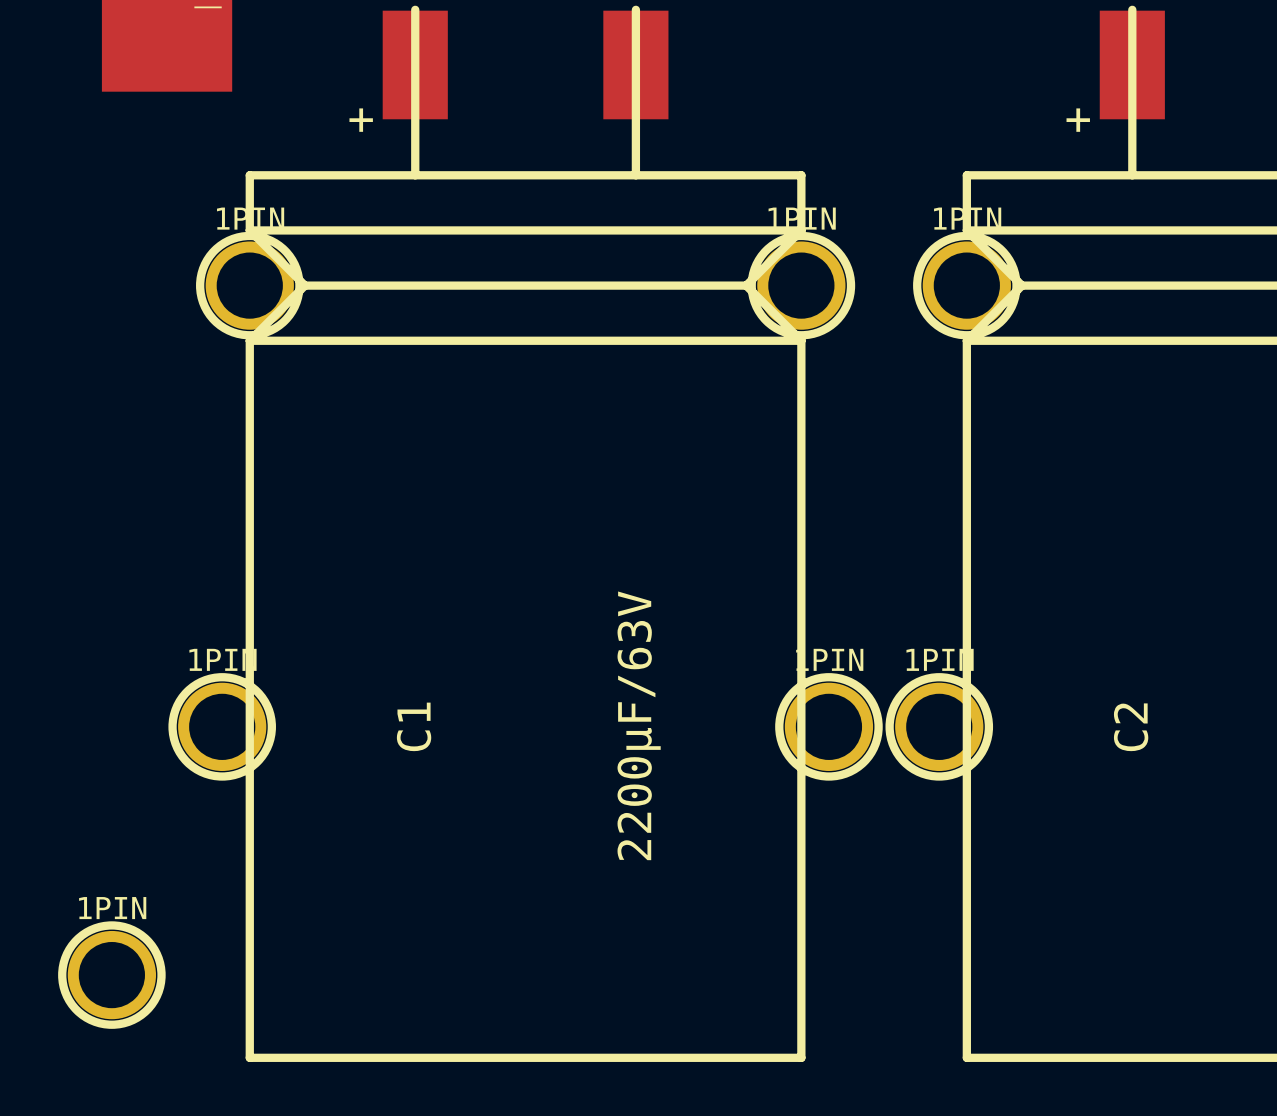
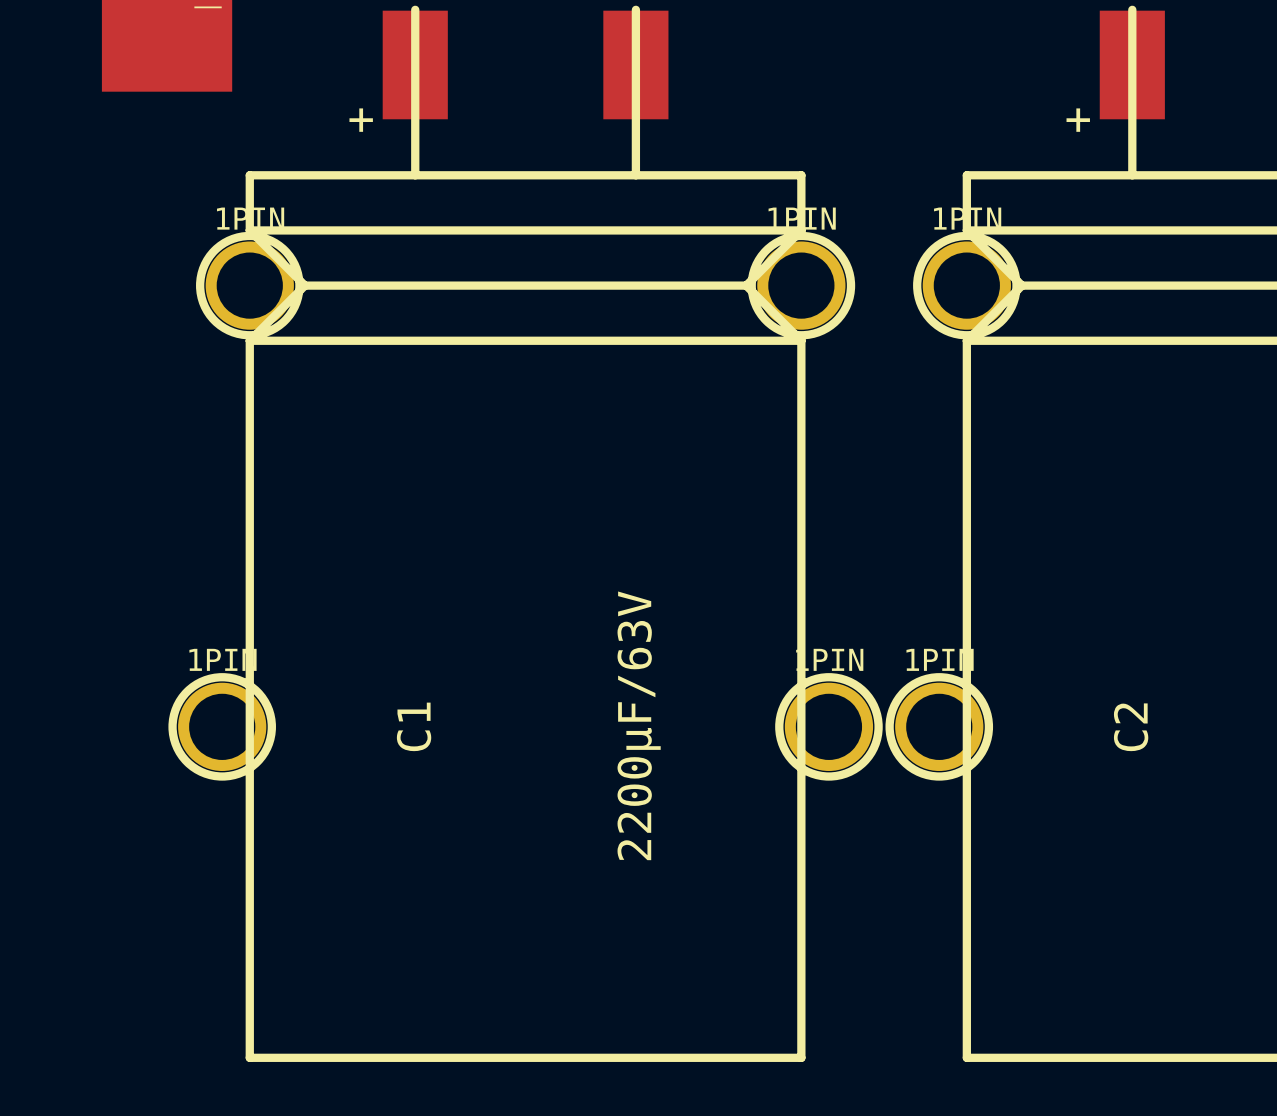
1PIN: (111, 975) -> none

